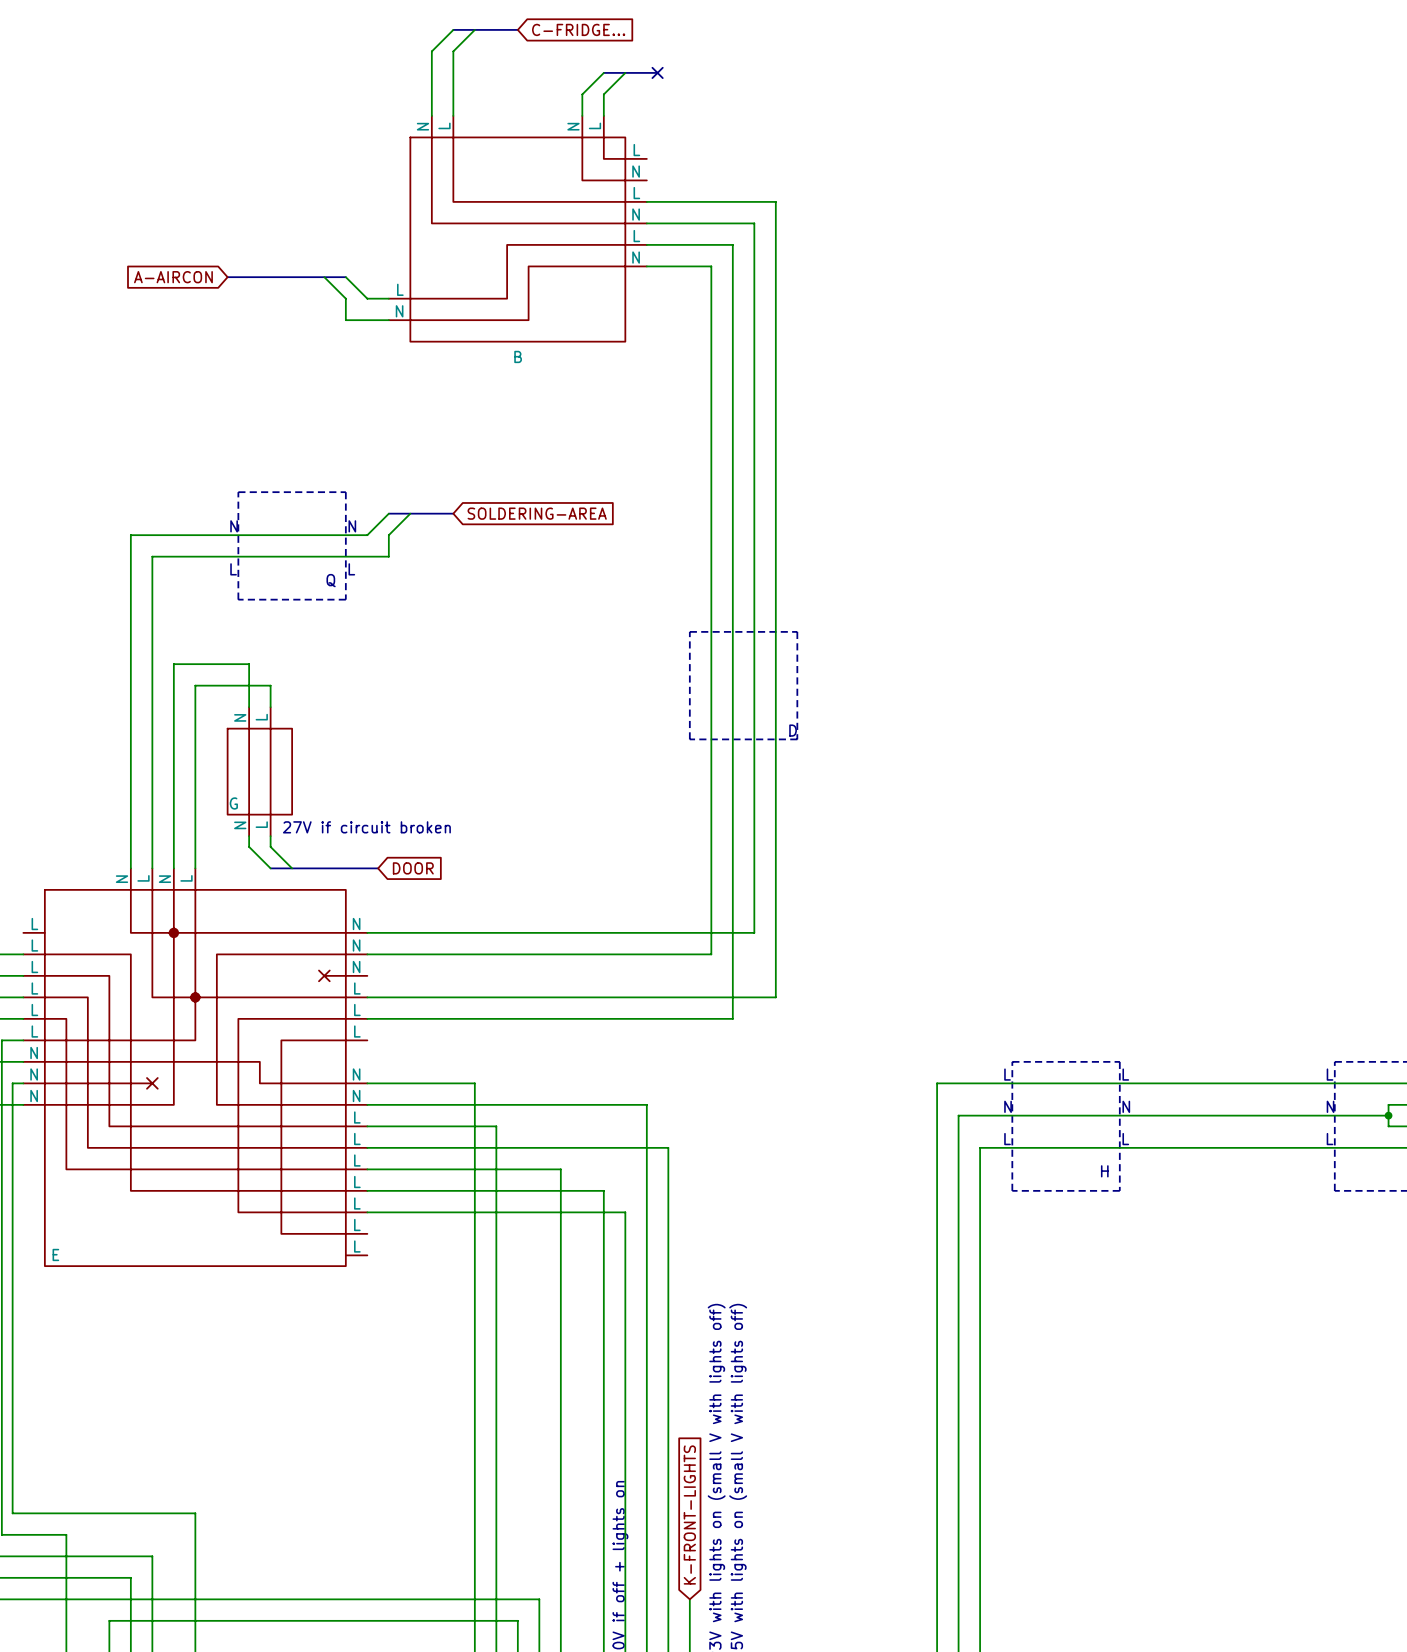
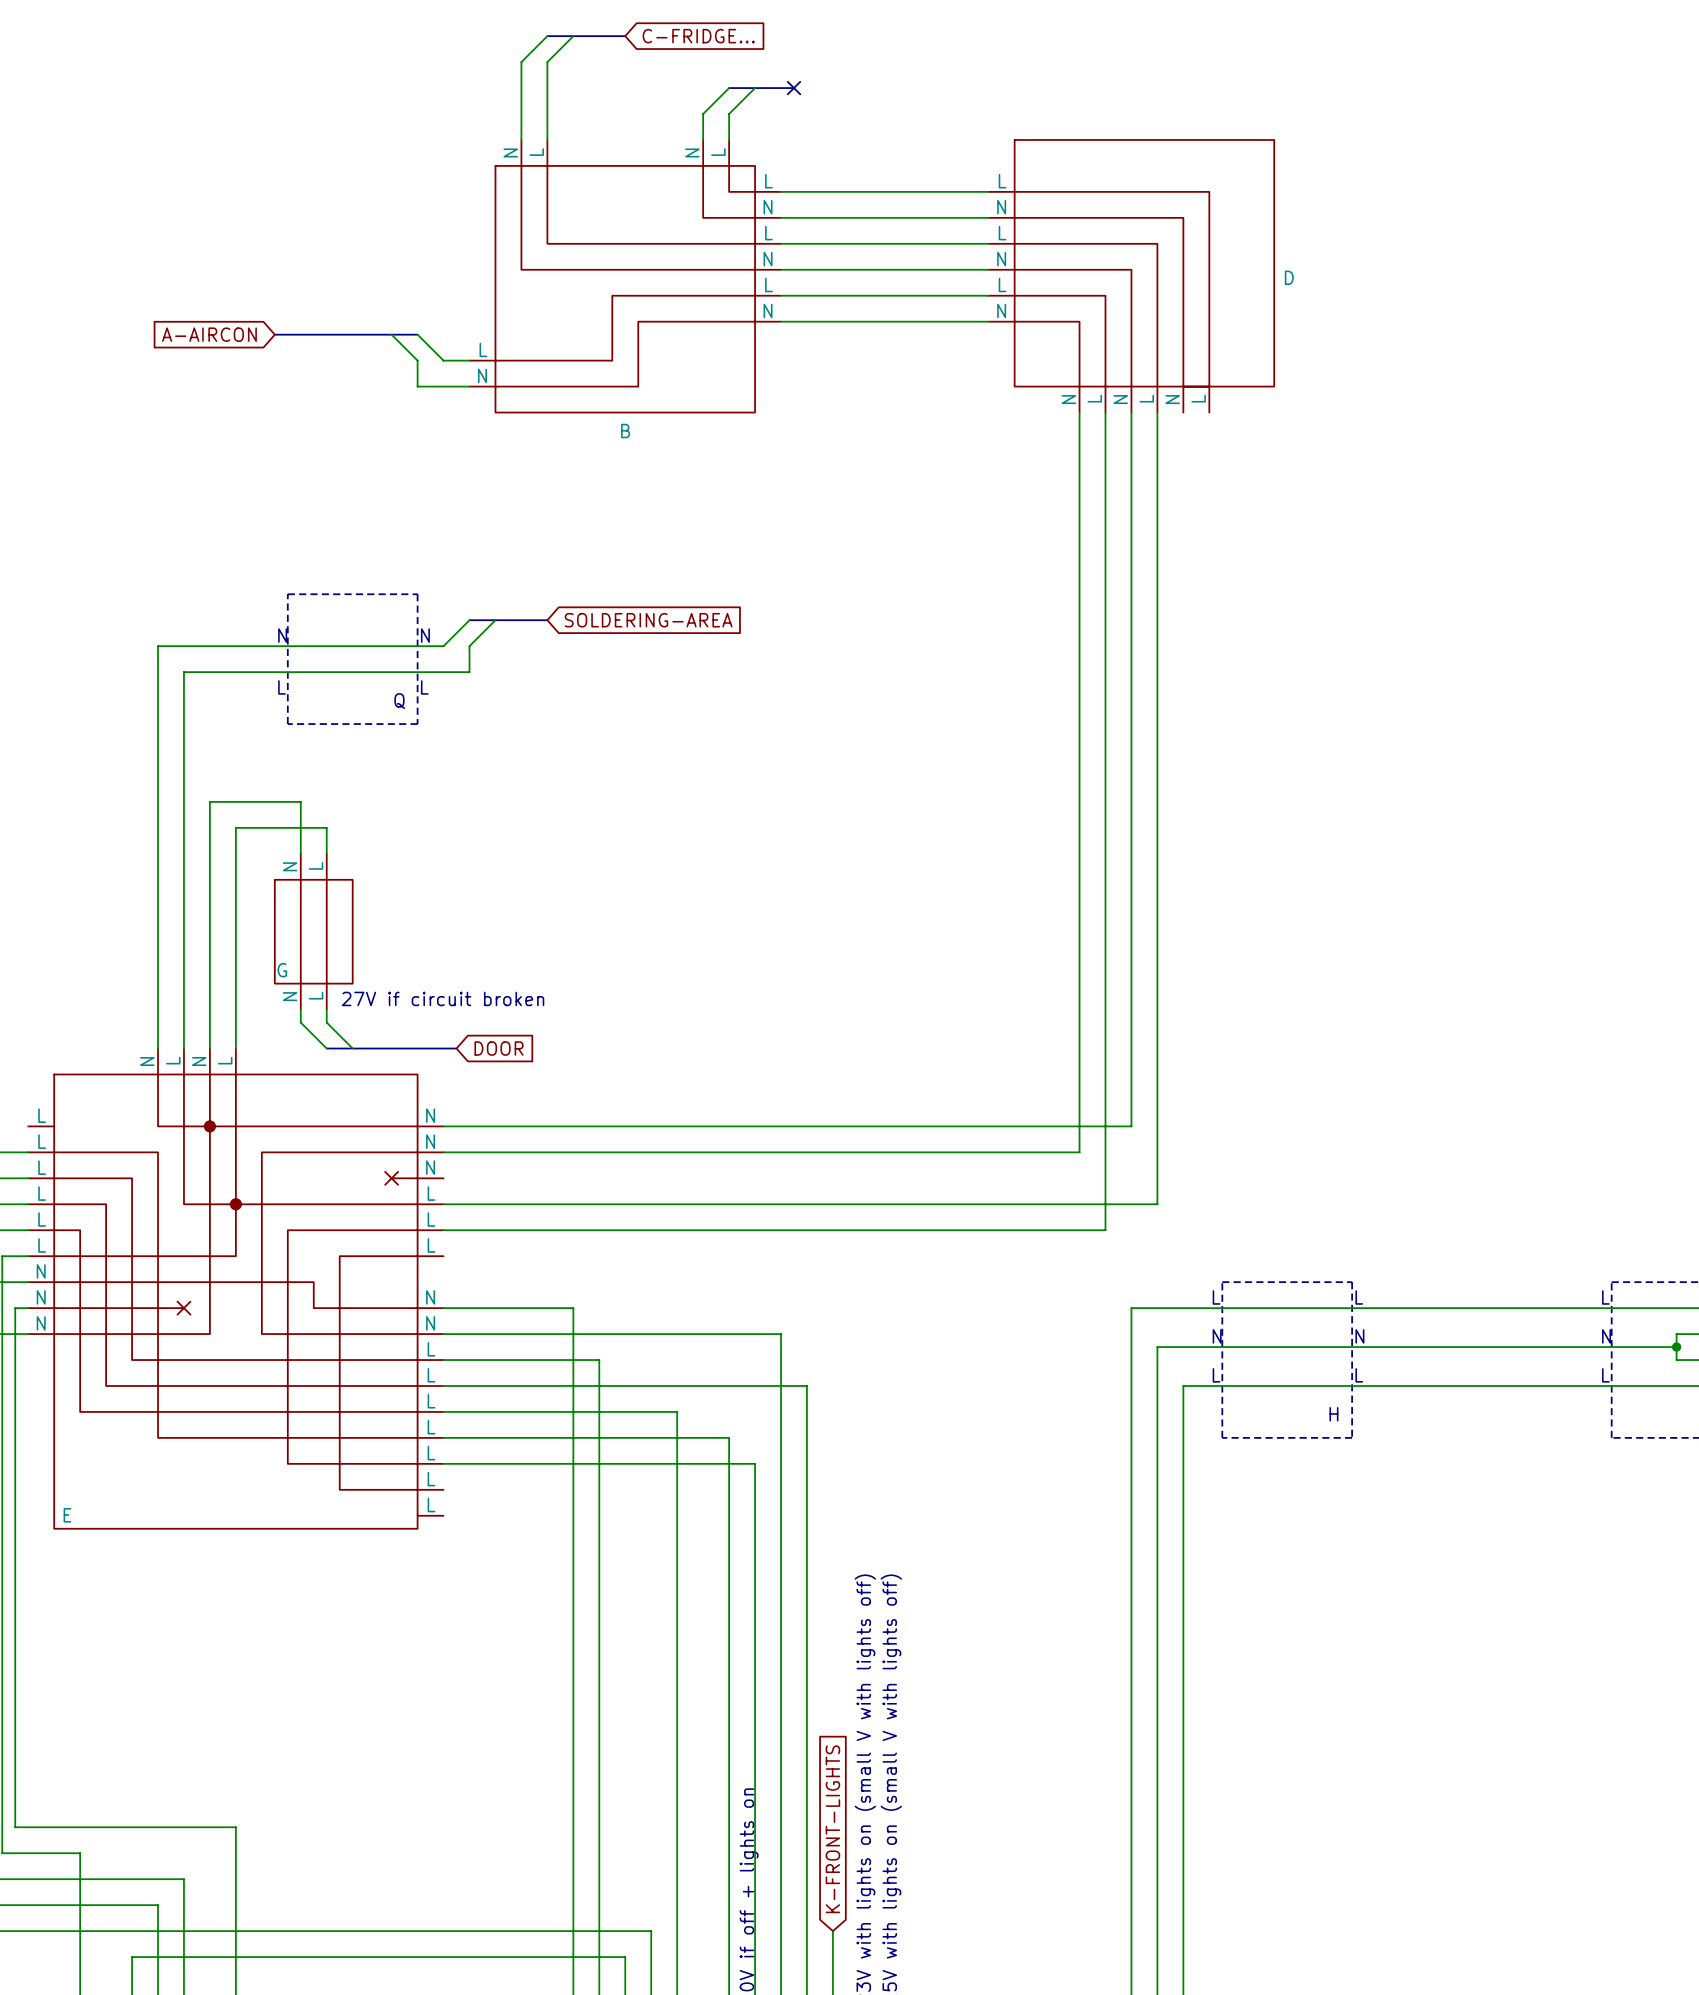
wire: none -> (781, 191) (988, 191)
wire: none -> (781, 217) (988, 217)
wire: (775, 201) (775, 997) -> (1157, 412) (1157, 1204) (936, 1204)
wire: none -> (936, 243) (988, 243)
wire: (754, 223) (754, 932) -> (1131, 412) (1131, 1126) (910, 1126)
wire: none -> (910, 269) (988, 269)
part: none -> D (1131, 276)
wire: (732, 244) (732, 1018) -> (1105, 412) (1105, 1230) (884, 1230)
wire: none -> (884, 295) (988, 295)
wire: (711, 266) (711, 954) -> (1079, 412) (1079, 1152) (858, 1152)
wire: none -> (858, 321) (988, 321)
line: (689, 631) (797, 631) (797, 739) (689, 739) (689, 631) -> none
text: D (793, 730) -> none

